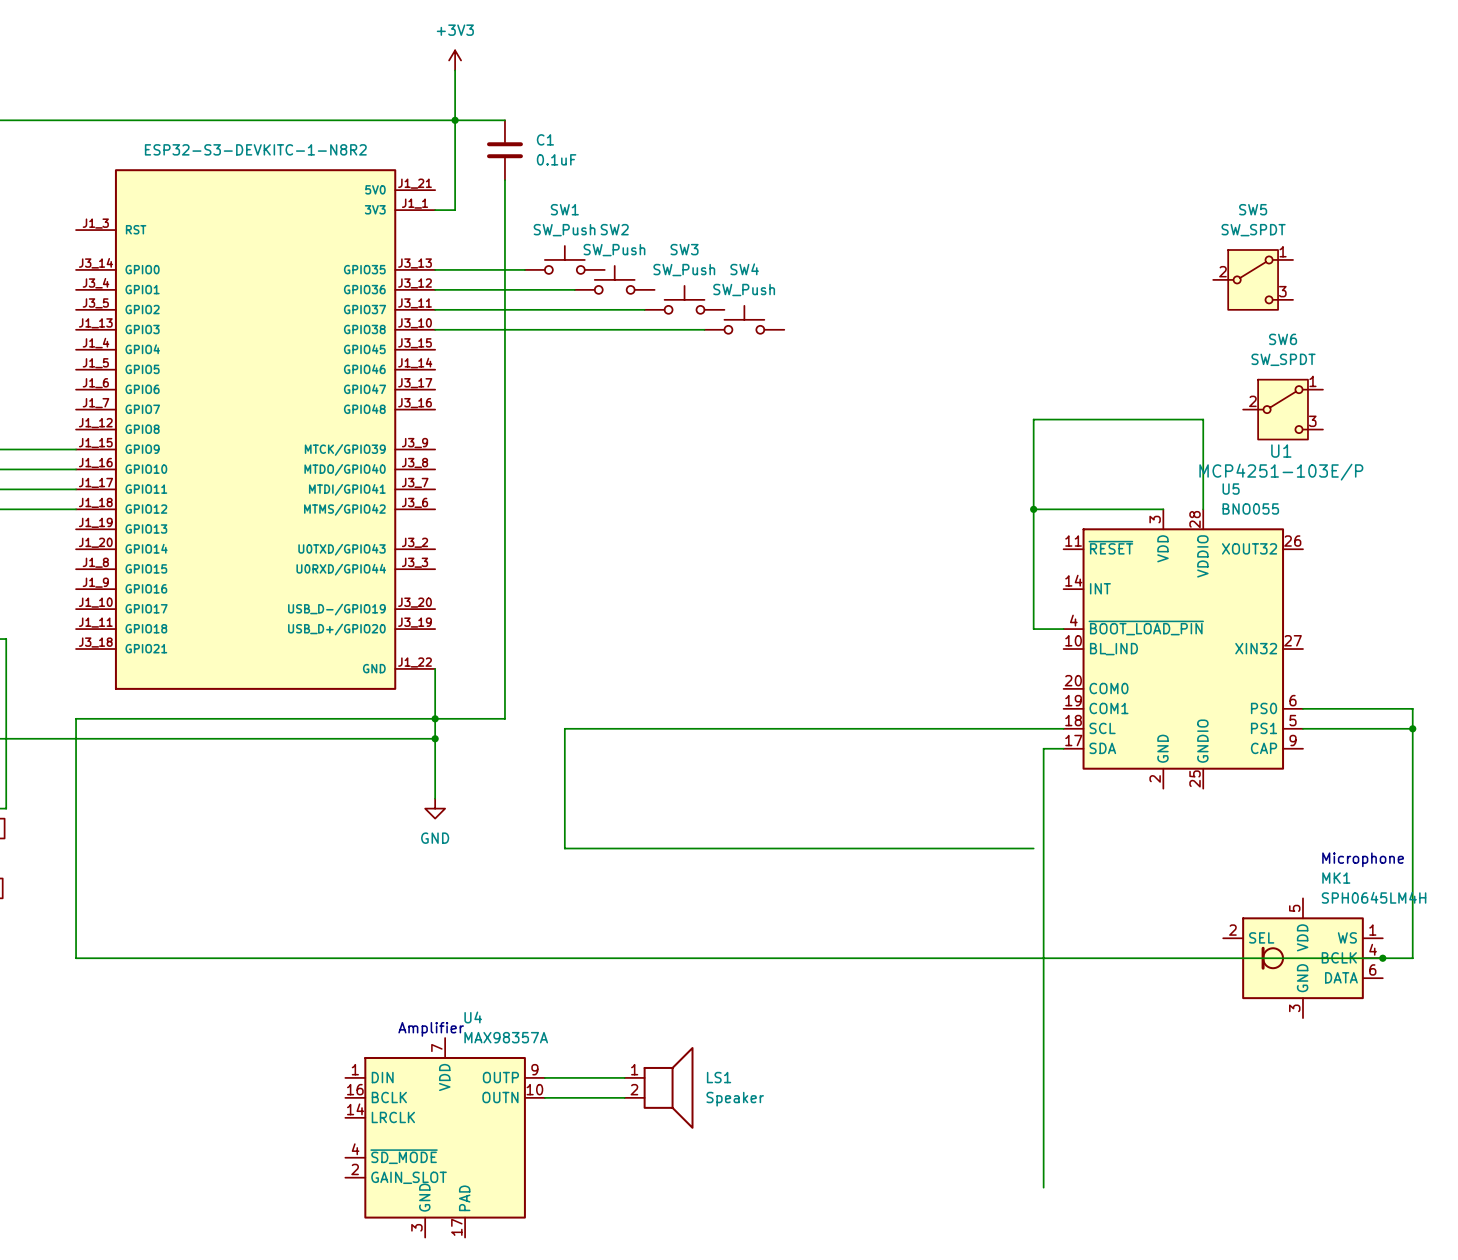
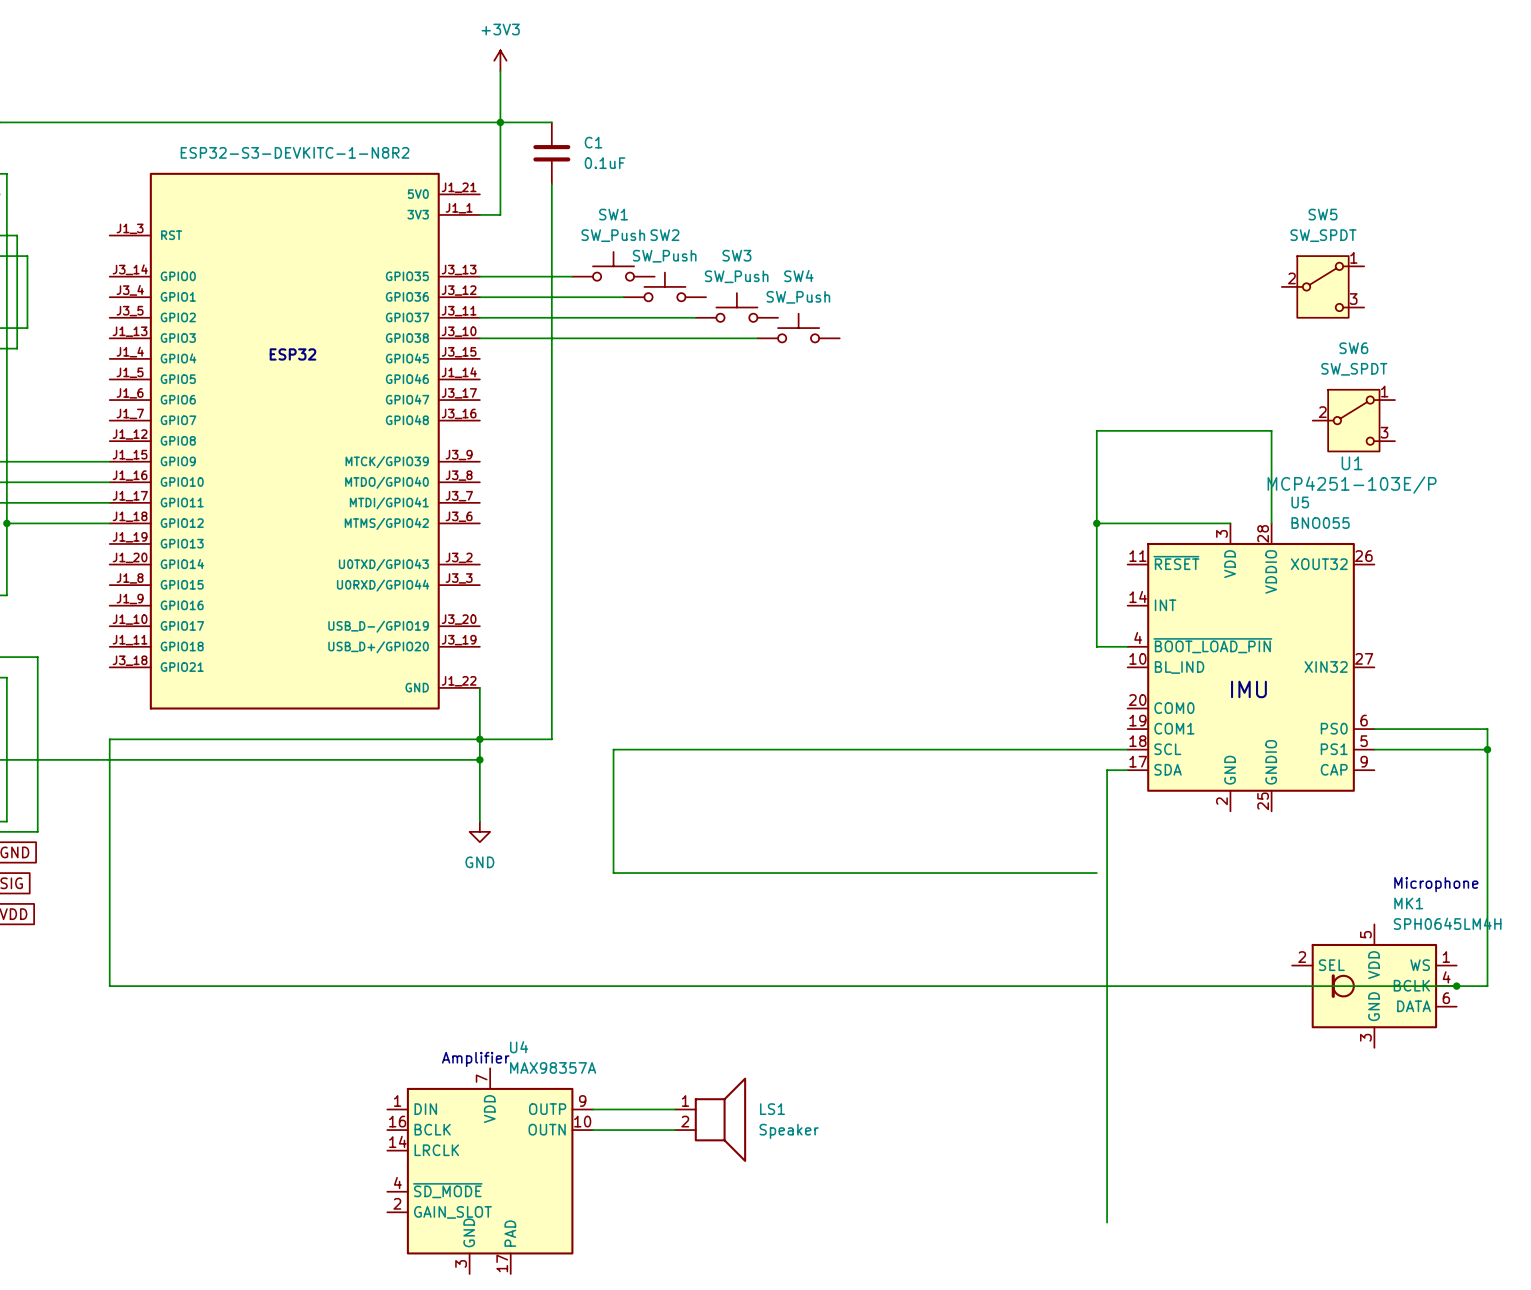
text: none -> ESP32 (292, 354)
text: none -> IMU (1248, 689)

